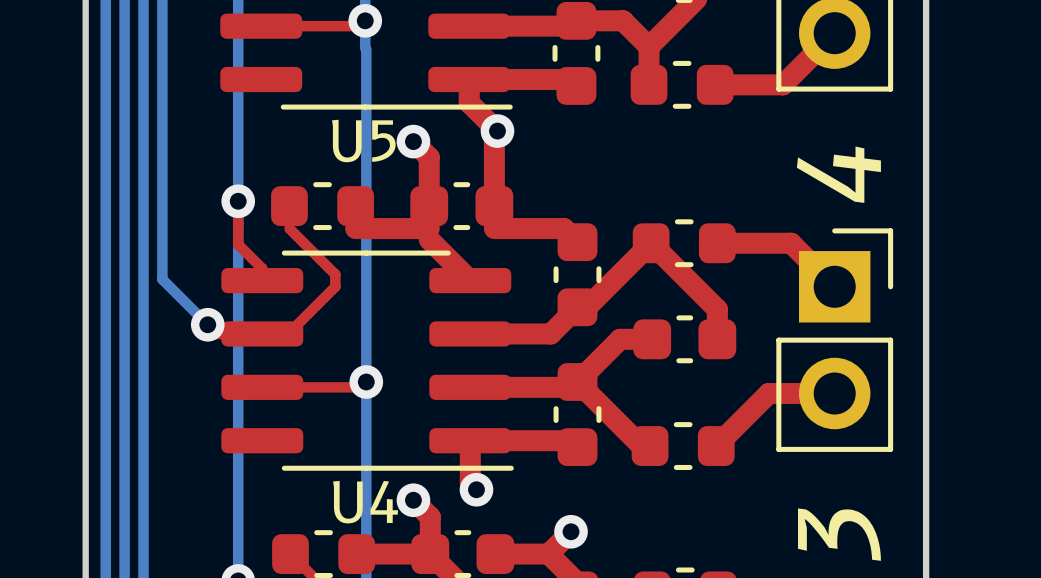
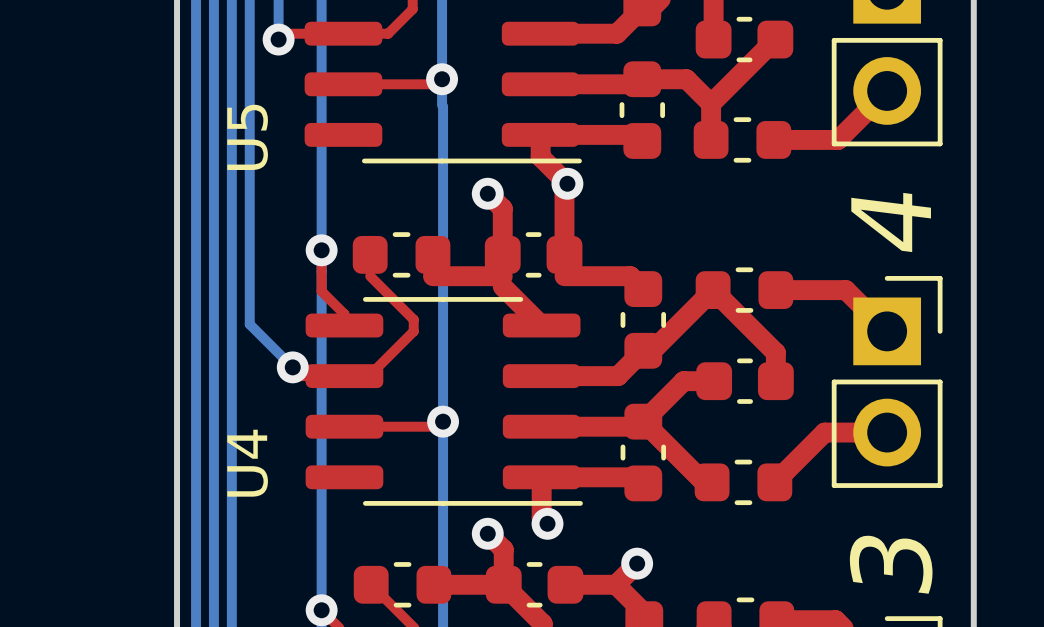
U5 name rotation: 0° (363, 141) -> 90° counterclockwise (247, 137)
U5 name position: U5 (363, 141) -> U5 (247, 137)
U4 name rotation: 0° (365, 502) -> 90° counterclockwise (247, 463)
U4 name position: U4 (365, 502) -> U4 (247, 463)

